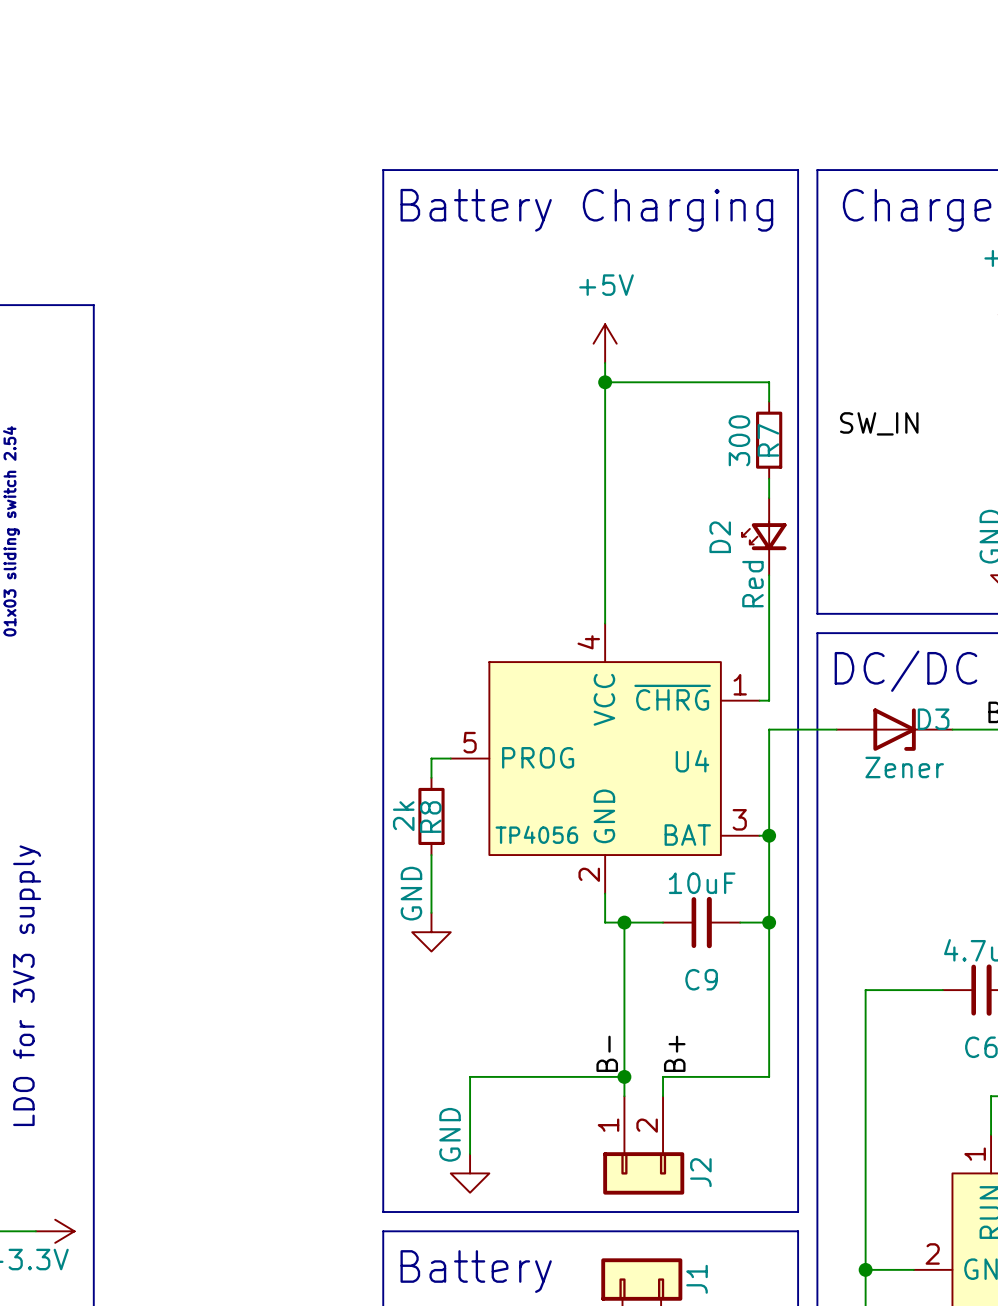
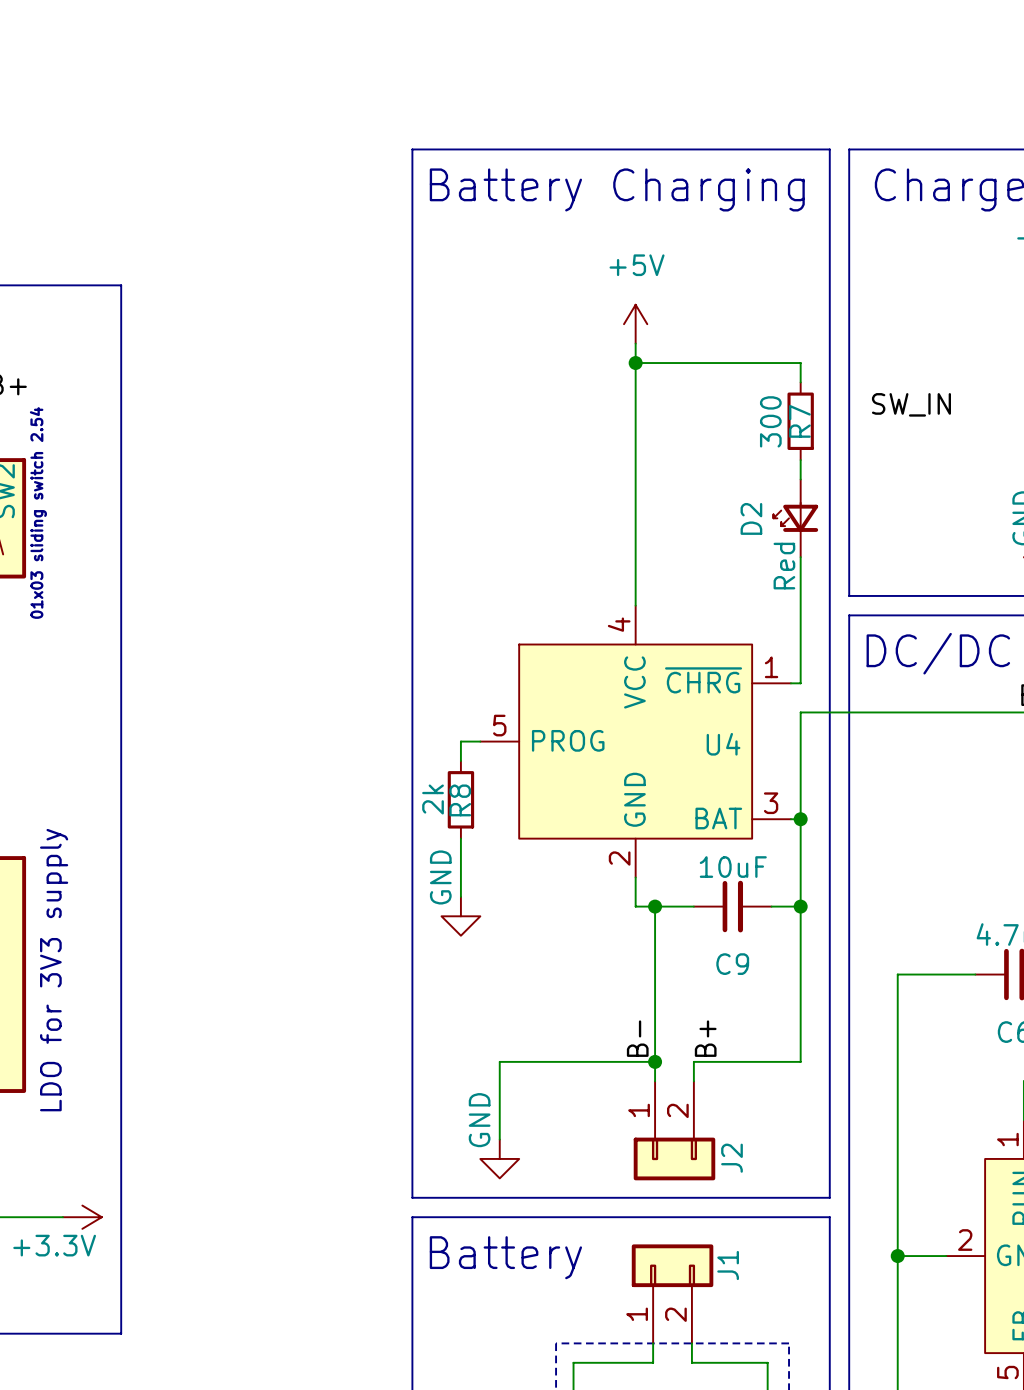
D3: Zener (894, 729) -> none
U4 value: TP4056 (536, 834) -> none

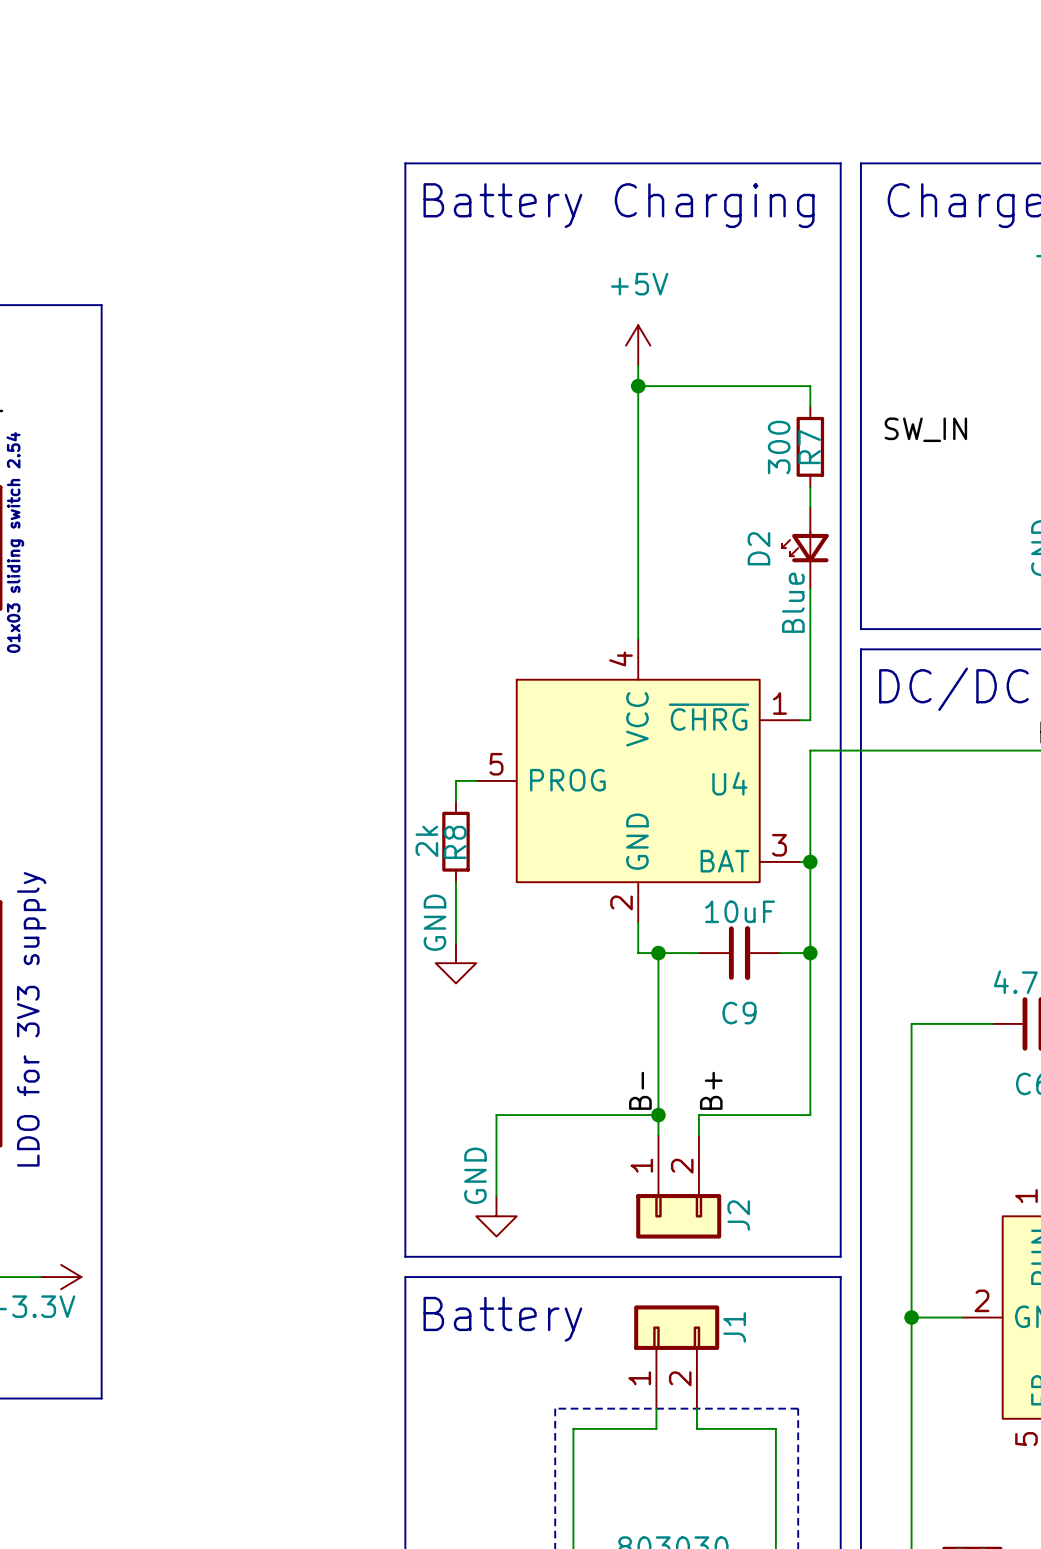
D2 value: Red (784, 566) -> Blue (793, 602)

